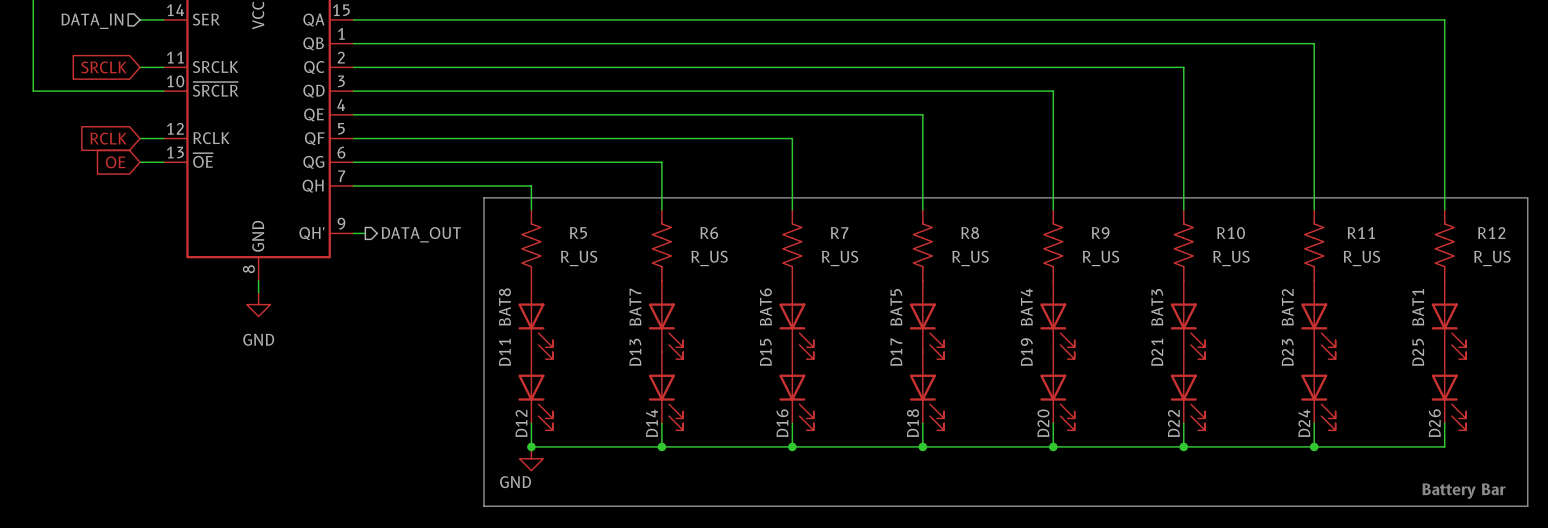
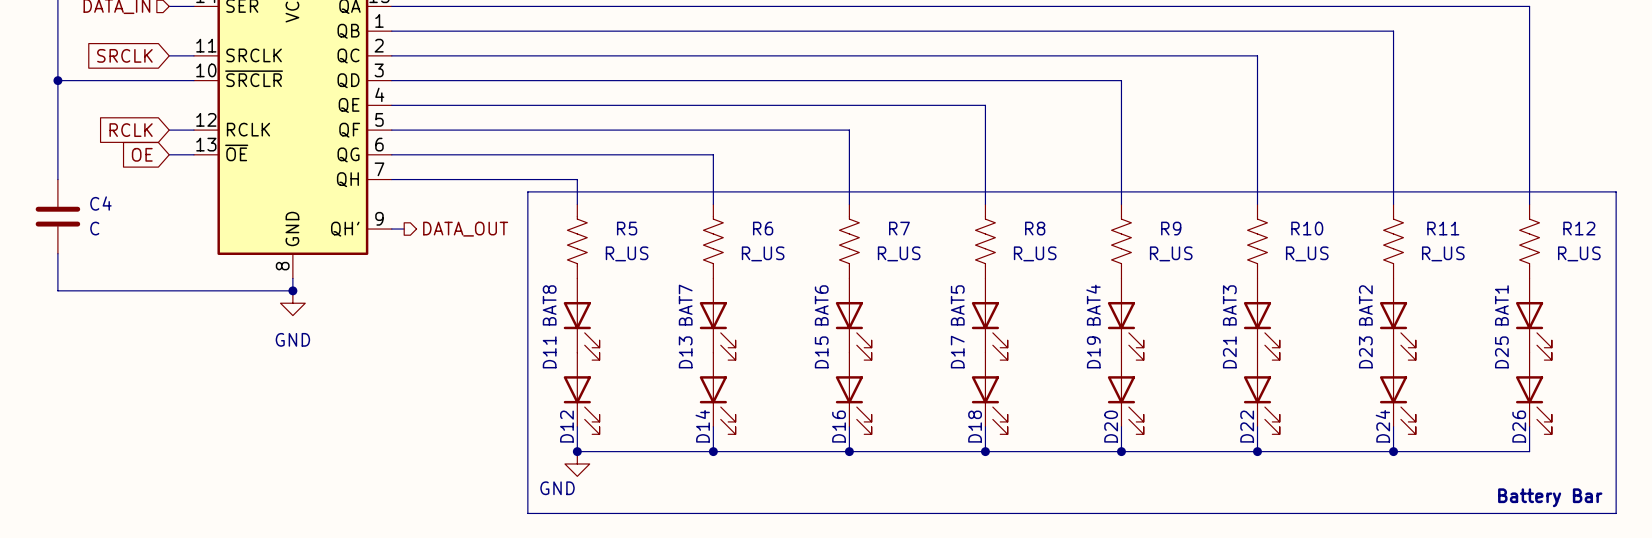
wire: none -> (57, 80) (57, 179)
junction: none -> (57, 80)
C4: none -> C (57, 216)
wire: none -> (57, 253) (57, 290) (292, 290)
junction: none -> (292, 290)

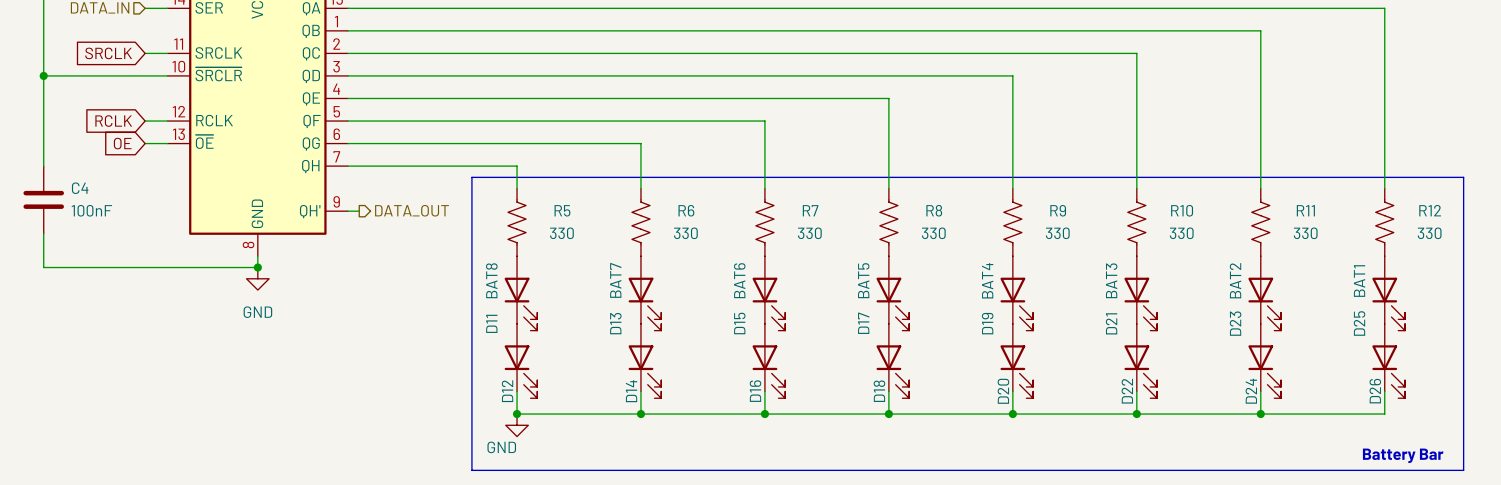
C4 value: C (94, 228) -> 100nF (91, 210)
R5 value: R_US (627, 253) -> 330 (561, 233)
R6 value: R_US (763, 253) -> 330 (685, 233)
R7 value: R_US (899, 253) -> 330 (809, 233)
R8 value: R_US (1035, 253) -> 330 (933, 233)
R9 value: R_US (1171, 253) -> 330 (1057, 233)
R10 value: R_US (1307, 253) -> 330 (1181, 233)
R11 value: R_US (1443, 253) -> 330 (1305, 233)
R12 value: R_US (1579, 253) -> 330 (1429, 233)

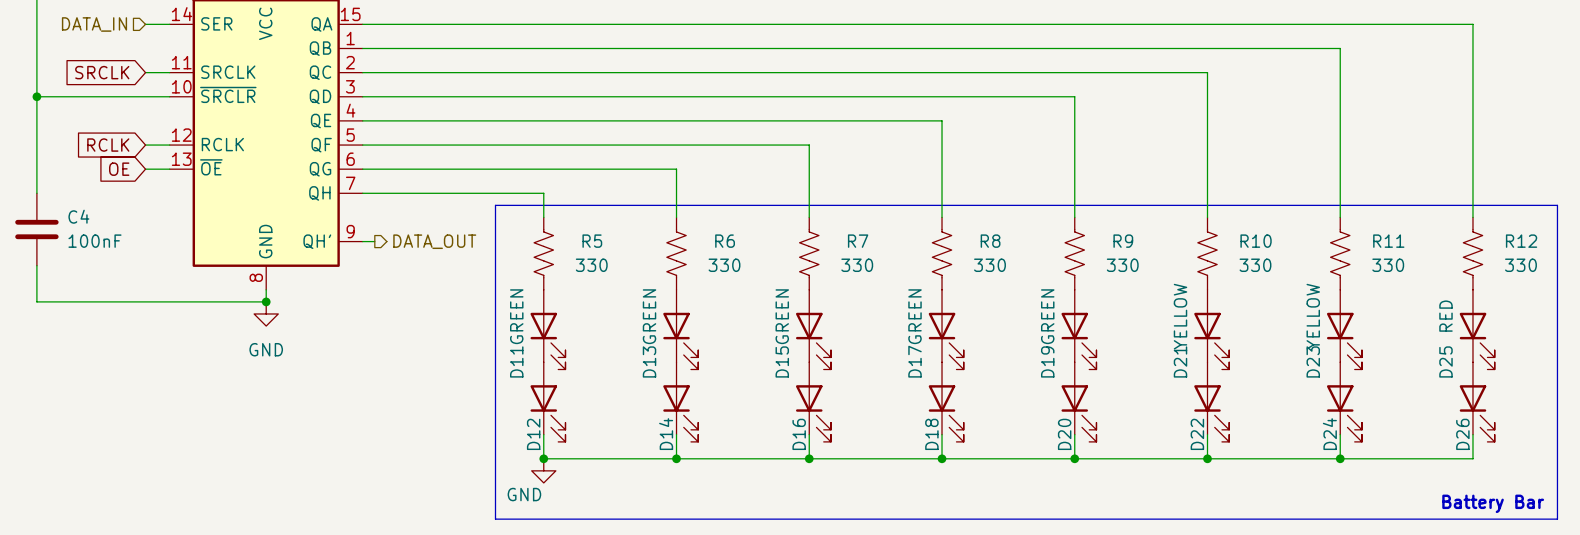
D11 value: BAT8 (491, 280) -> GREEN (516, 316)
D13 value: BAT7 (615, 280) -> GREEN (649, 316)
D15 value: BAT6 (739, 280) -> GREEN (782, 316)
D17 value: BAT5 (863, 280) -> GREEN (915, 316)
D19 value: BAT4 (987, 280) -> GREEN (1047, 316)
D21 value: BAT3 (1111, 280) -> YELLOW (1180, 316)
D23 value: BAT2 (1235, 280) -> YELLOW (1313, 316)
D25 value: BAT1 (1359, 281) -> RED (1445, 316)

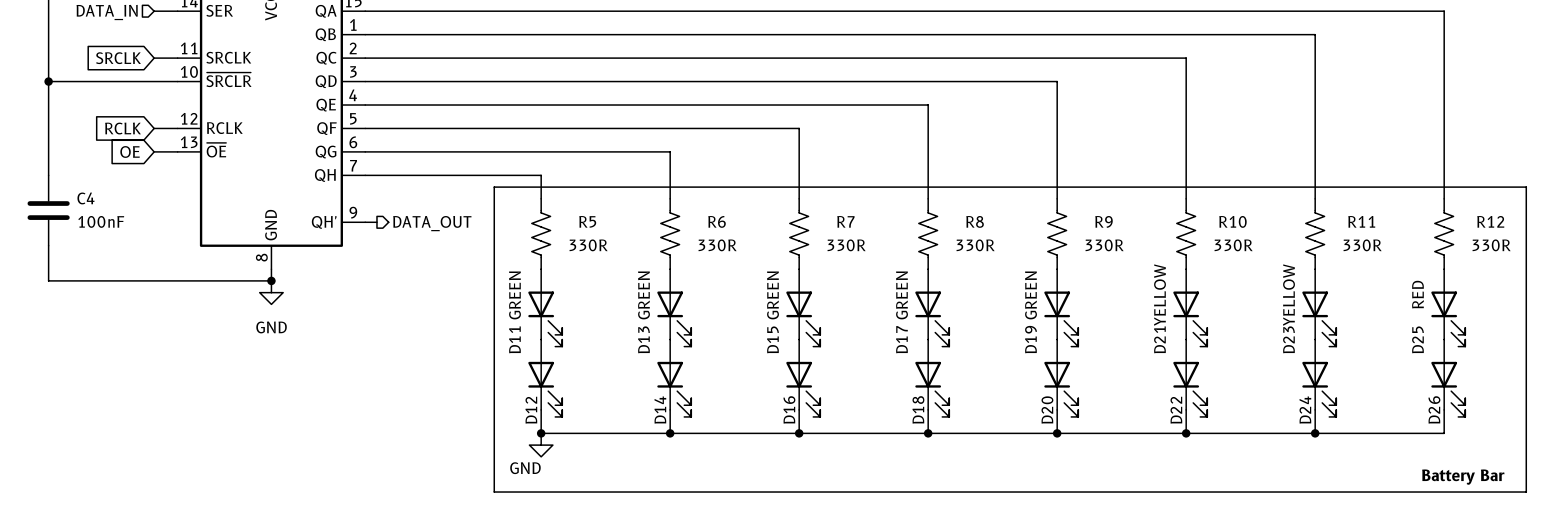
R5 value: 330 (591, 265) -> 330R (588, 245)
R6 value: 330 (724, 265) -> 330R (717, 245)
R7 value: 330 (857, 265) -> 330R (846, 245)
R8 value: 330 (989, 265) -> 330R (975, 245)
R9 value: 330 (1122, 265) -> 330R (1104, 245)
R10 value: 330 (1255, 265) -> 330R (1233, 245)
R11 value: 330 (1388, 265) -> 330R (1362, 245)
R12 value: 330 (1520, 265) -> 330R (1491, 245)

